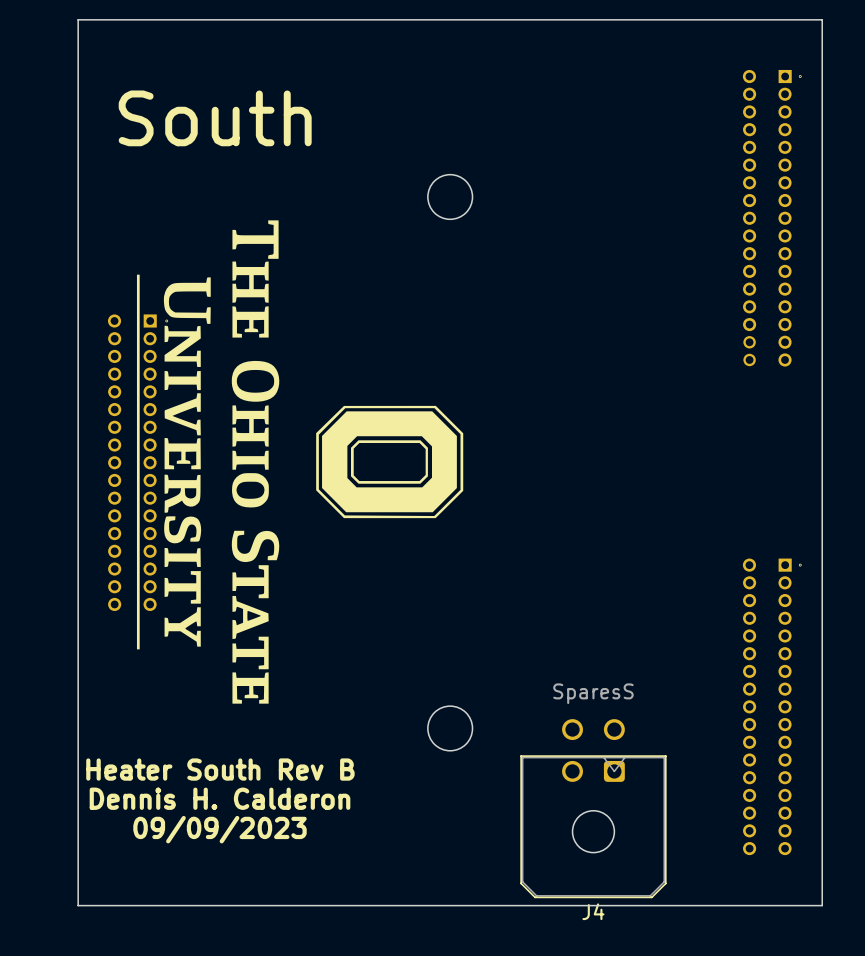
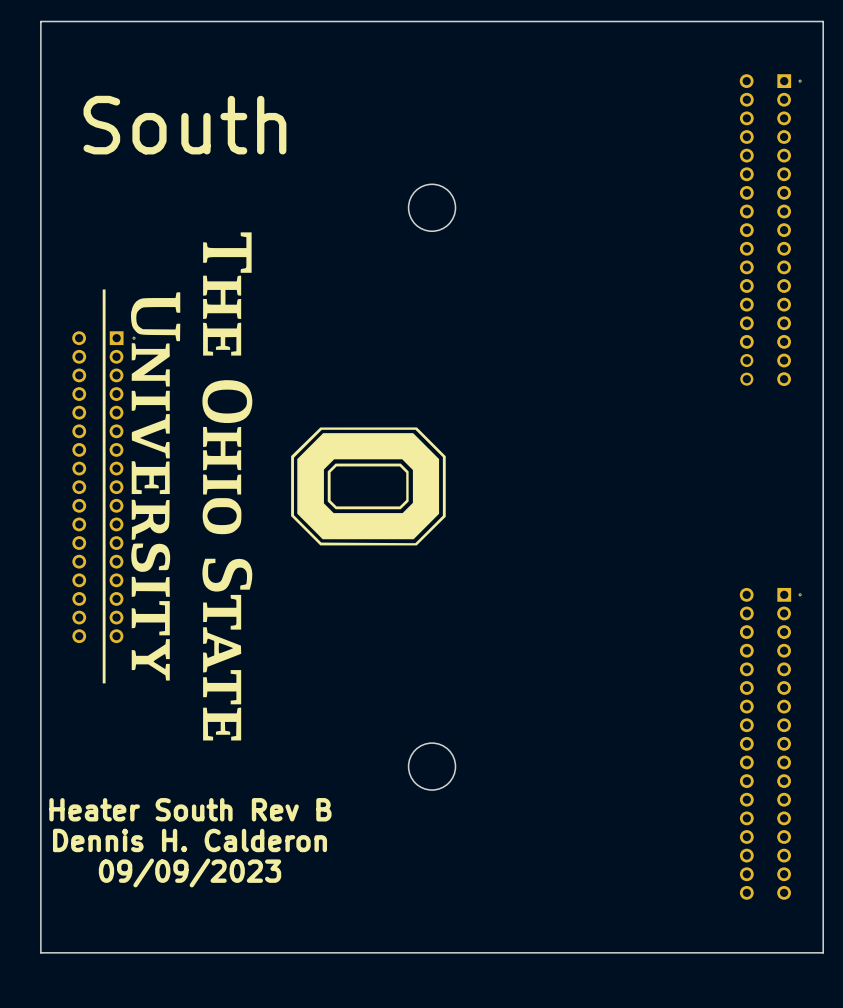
J4: SparesS (593, 808) -> none

